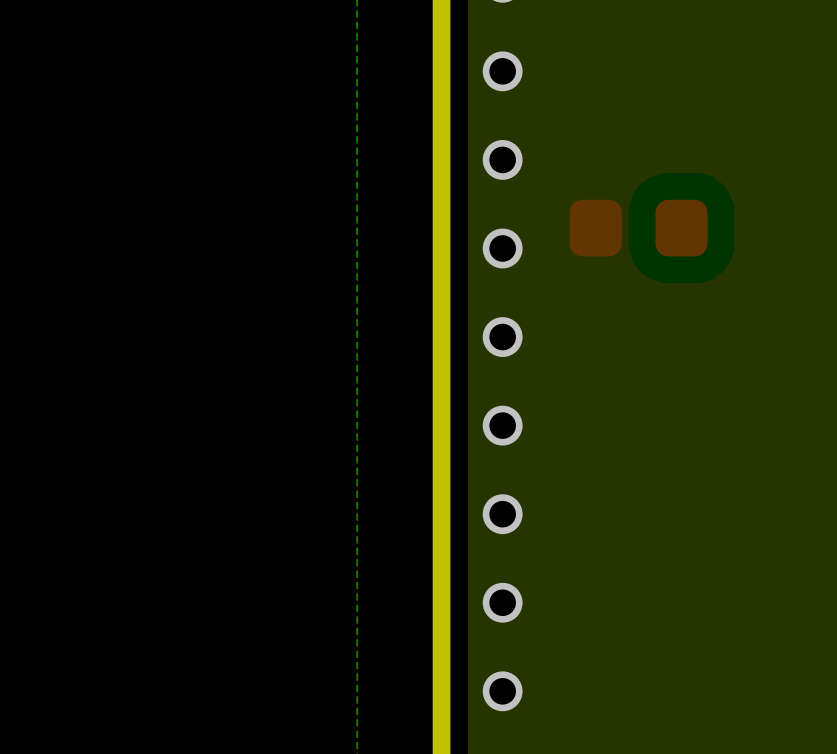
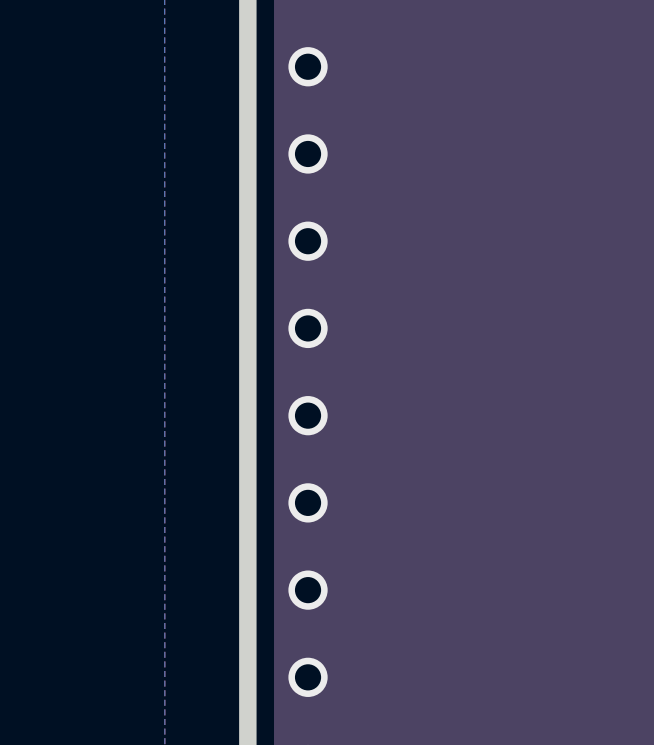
part: (638, 228) -> none

